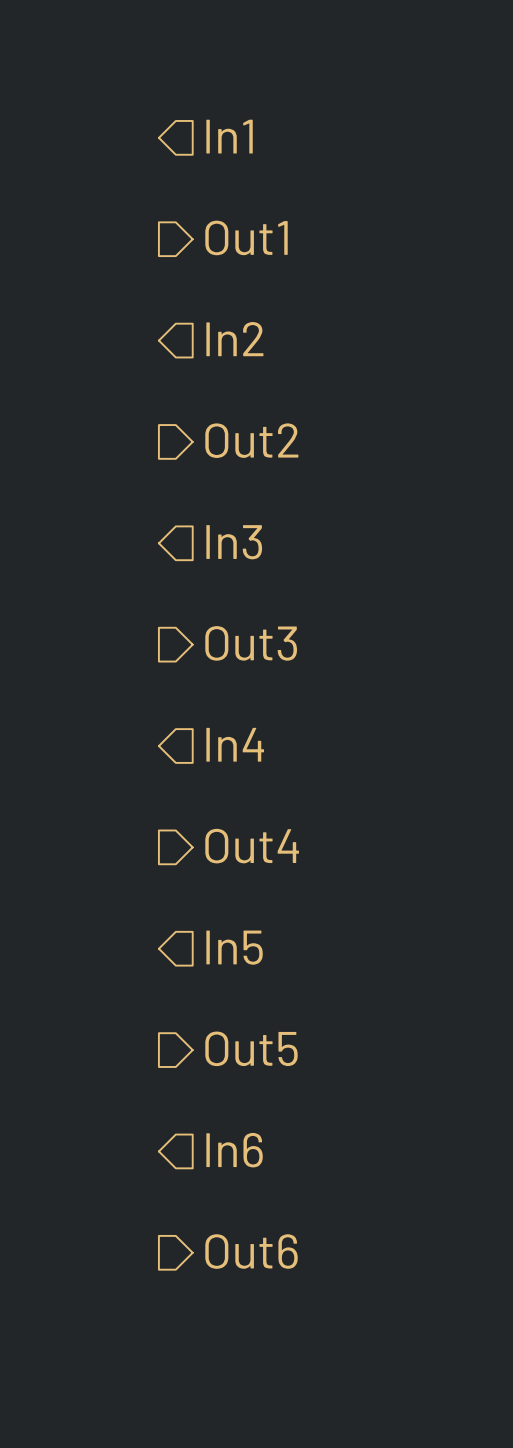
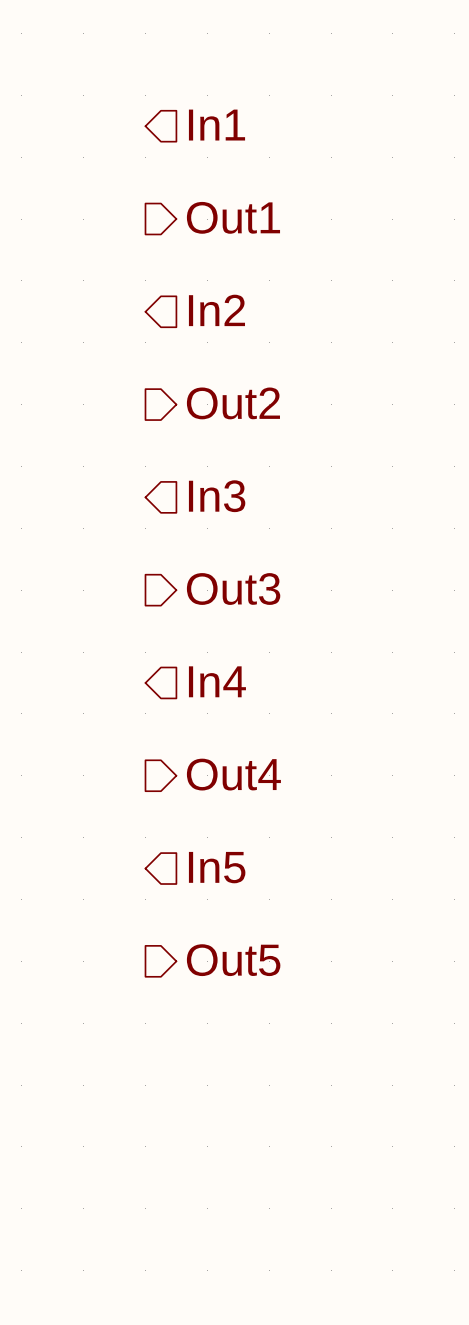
hierarchical label: In6 (234, 1150) -> none
hierarchical label: Out6 (251, 1251) -> none

